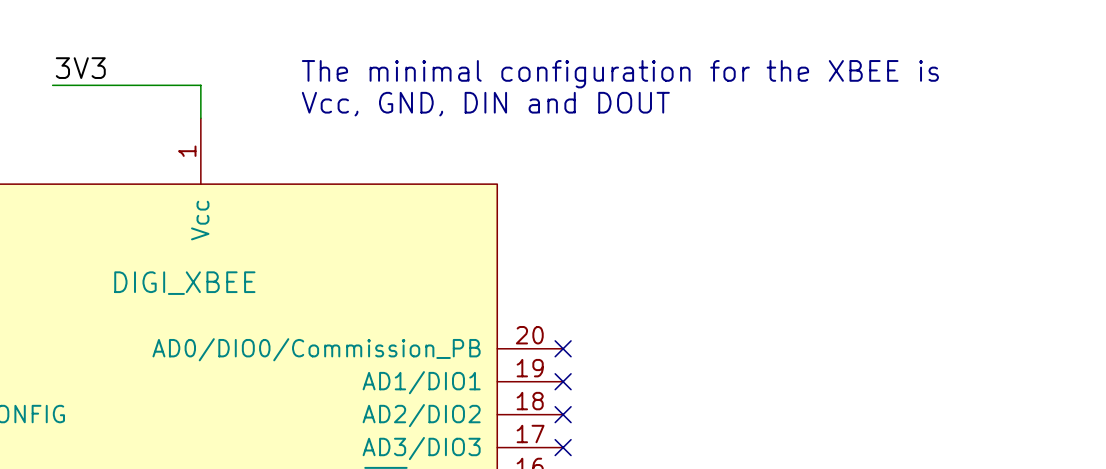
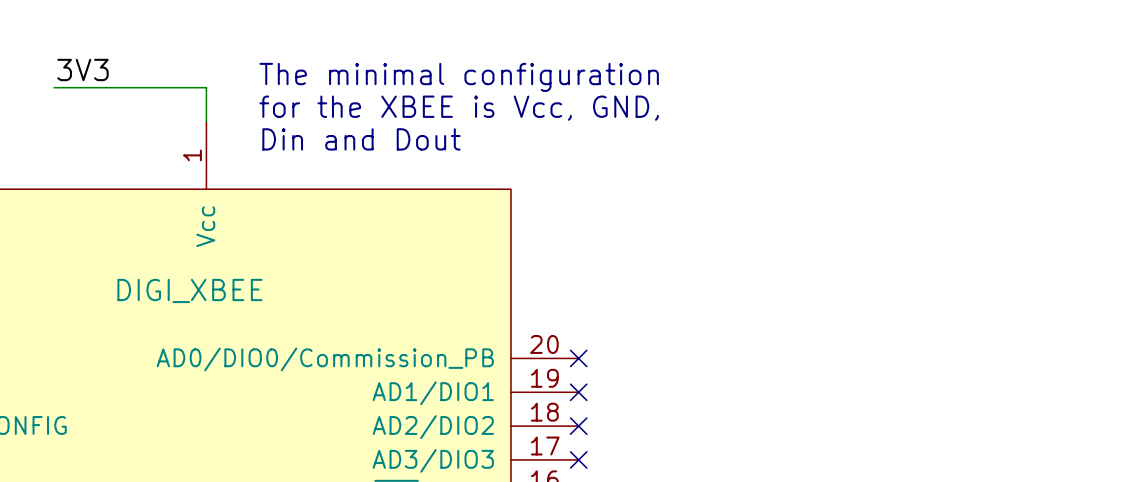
text: The minimal configuration for the XBEE is (620, 74) -> The minimal configuration (459, 77)
text: Vcc, GND, DIN and DOUT (485, 104) -> none
text: none -> for the XBEE is Vcc, GND, (459, 108)
text: none -> Din and Dout (361, 139)

